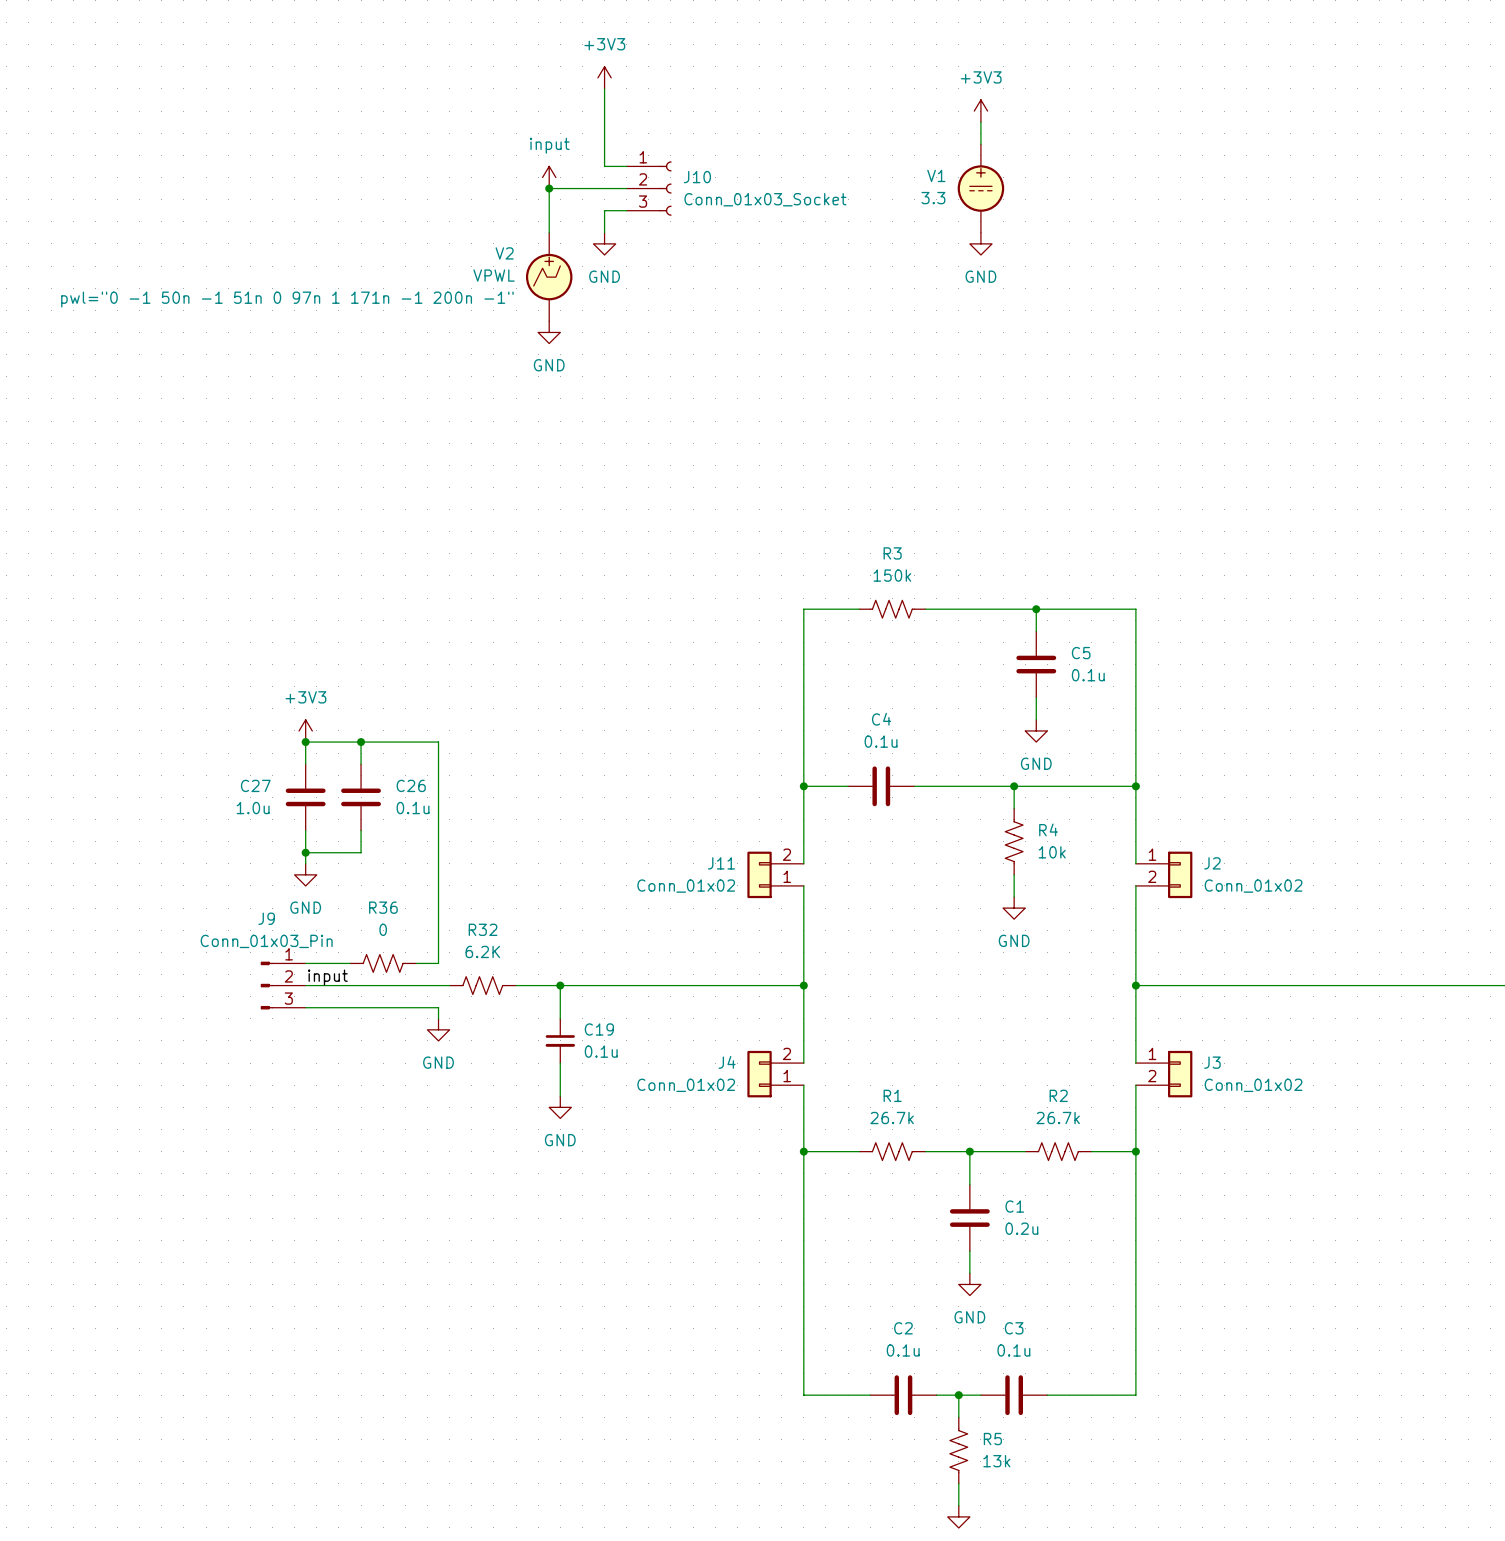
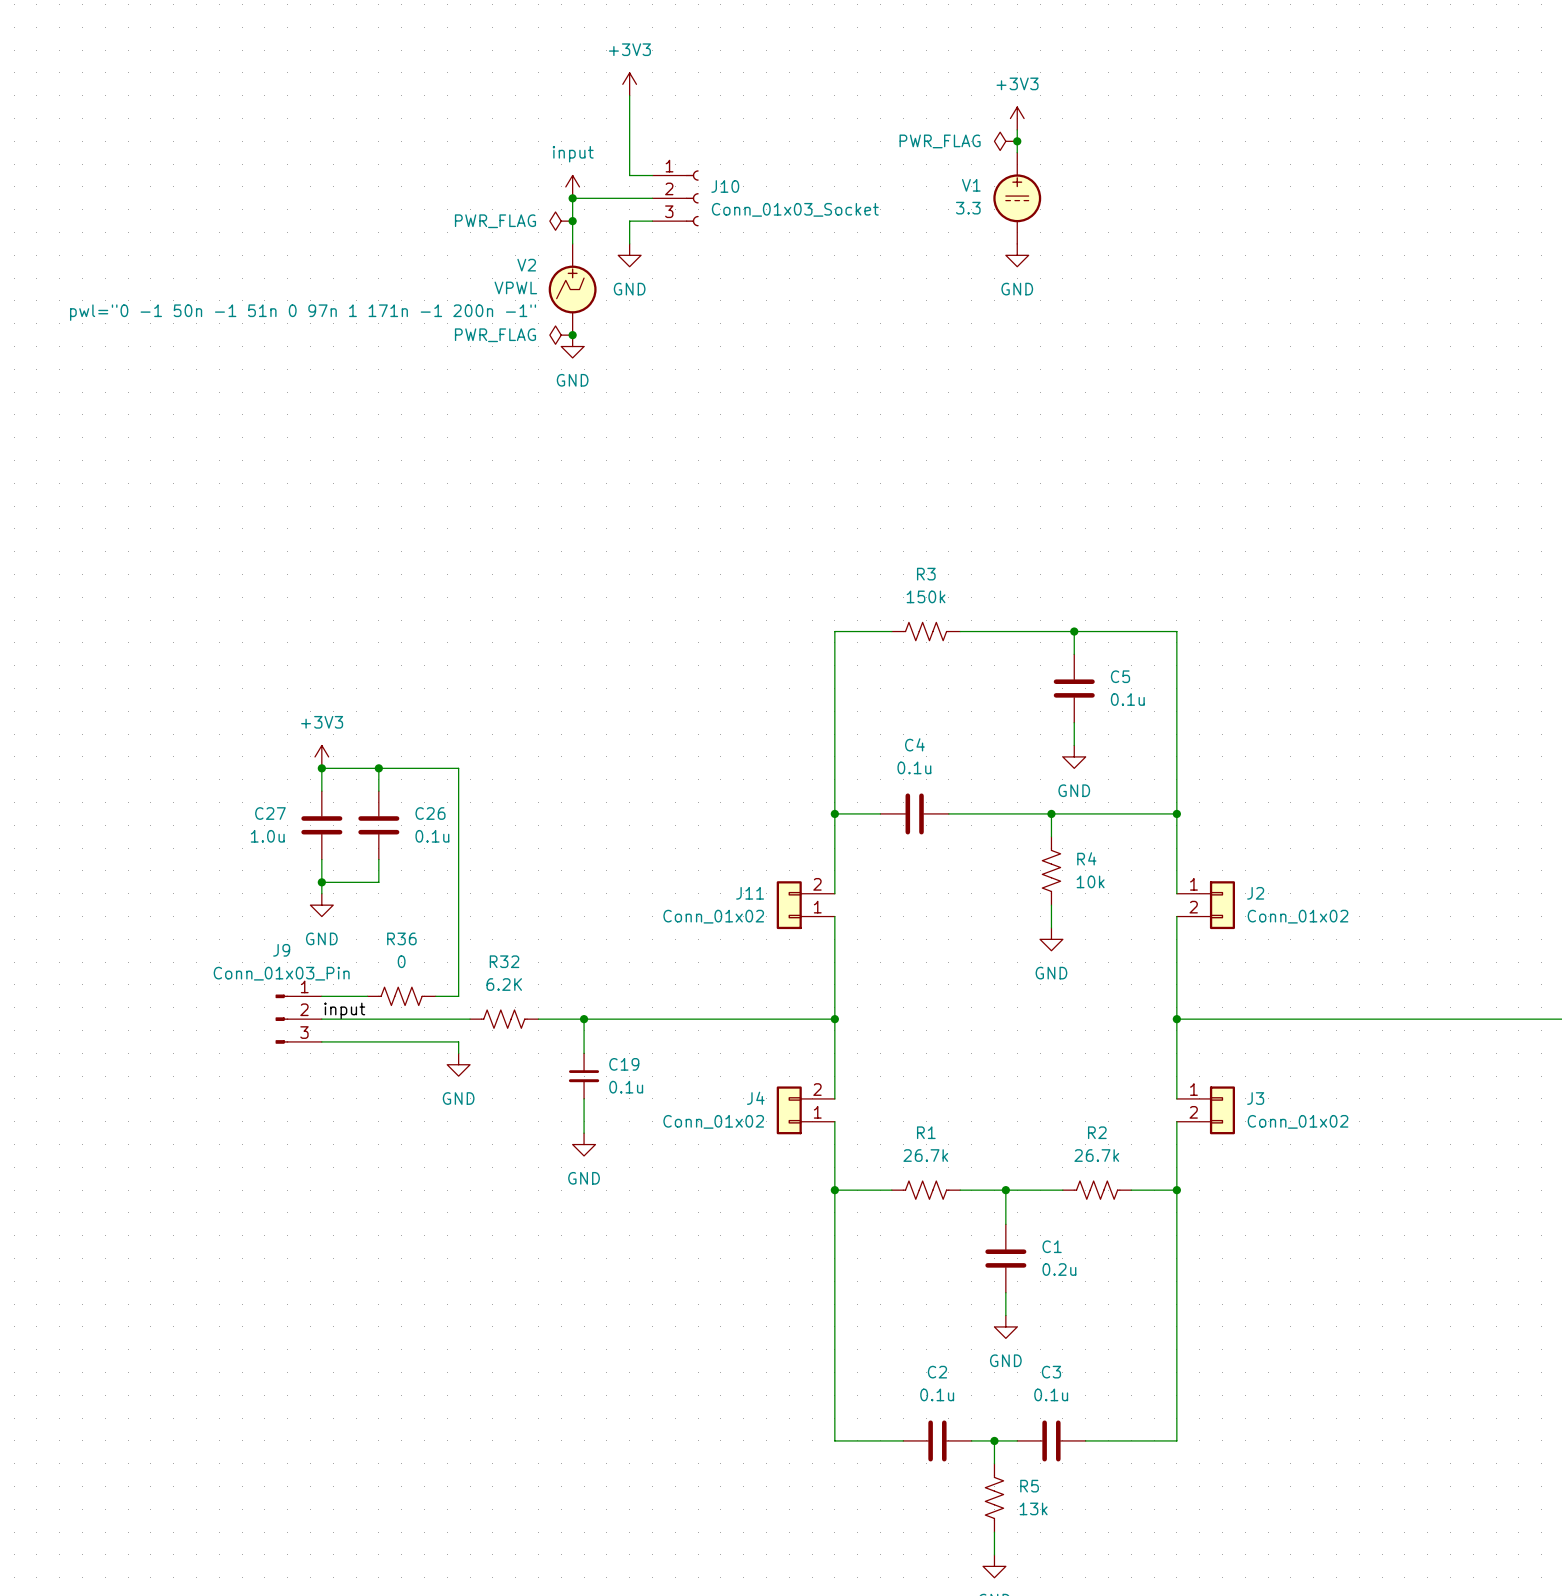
power symbol: none -> PWR_FLAG (1005, 141)
junction: none -> (1017, 141)
power symbol: none -> PWR_FLAG (561, 221)
junction: none -> (572, 221)
power symbol: none -> PWR_FLAG (561, 335)
junction: none -> (572, 335)

